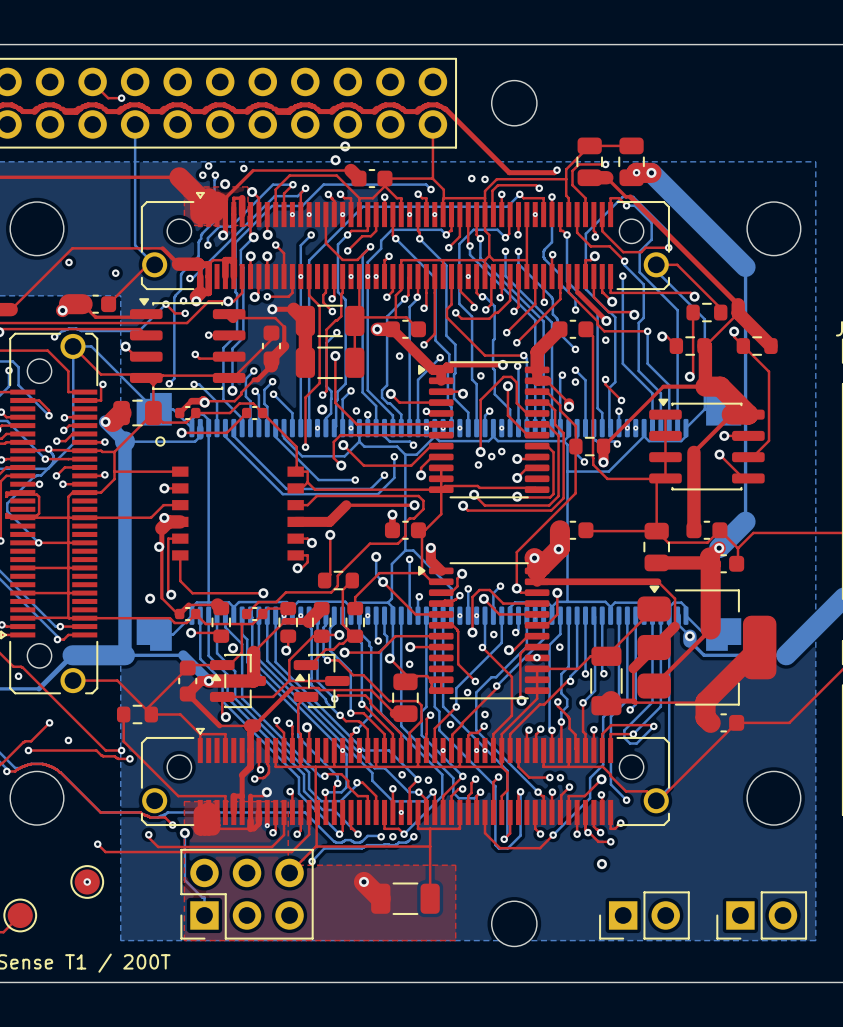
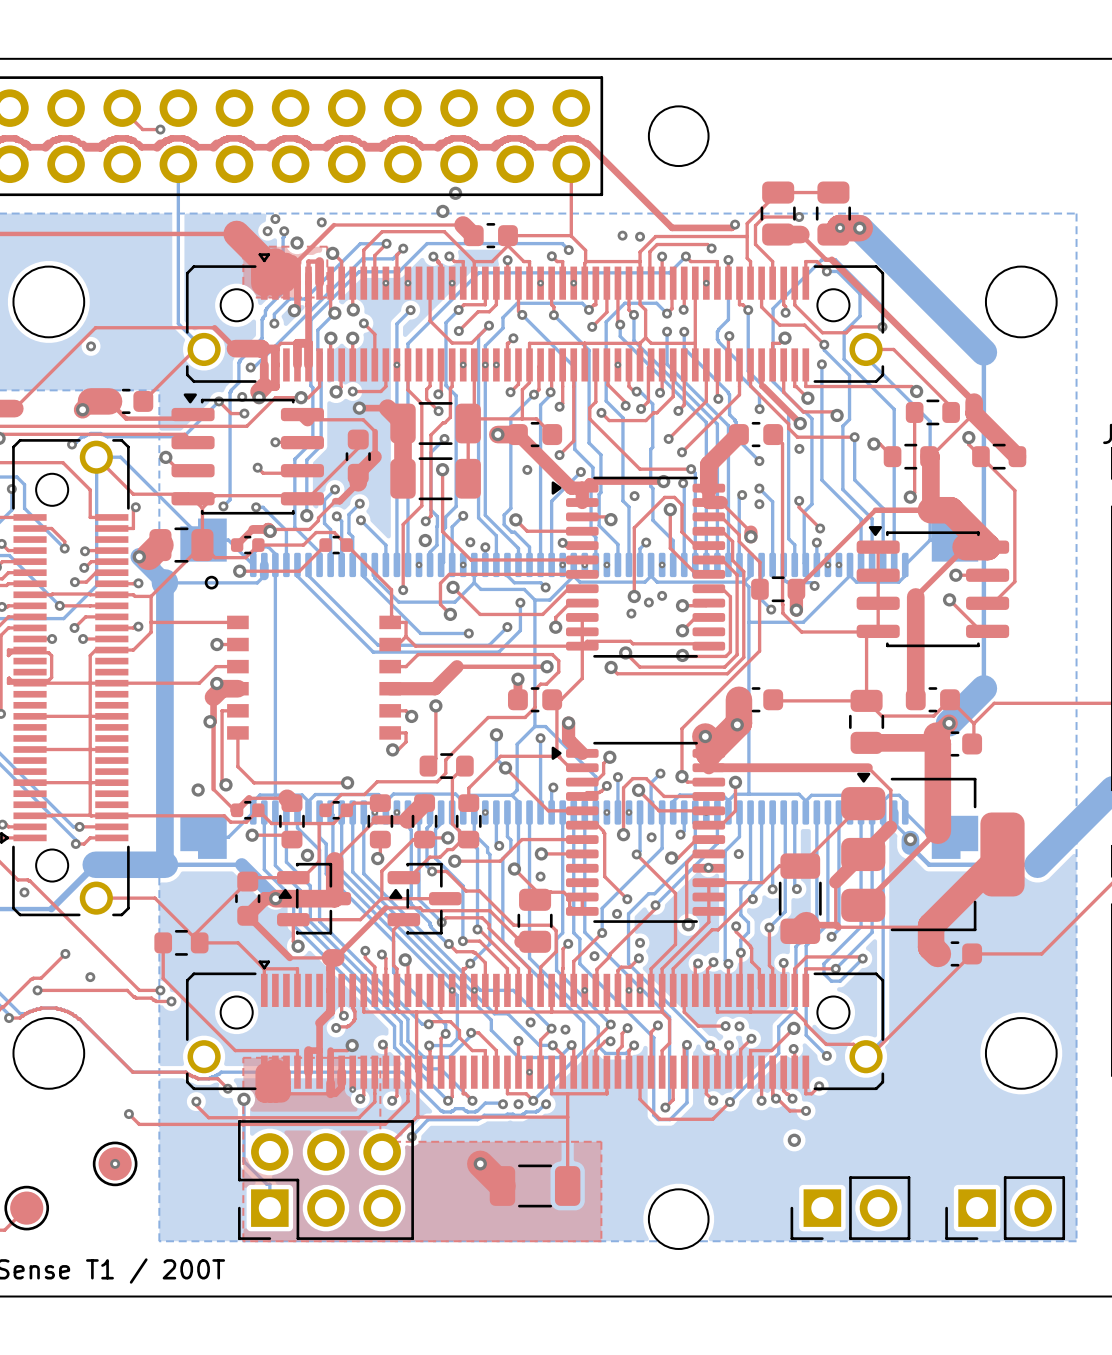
via: (115, 273) -> none
bottom track: (48, 449) (53, 457) (51, 464) (41, 475) (33, 477) (7, 503) (7, 511) (38, 542) -> none
via: (48, 449) -> none
via: (38, 542) -> none

